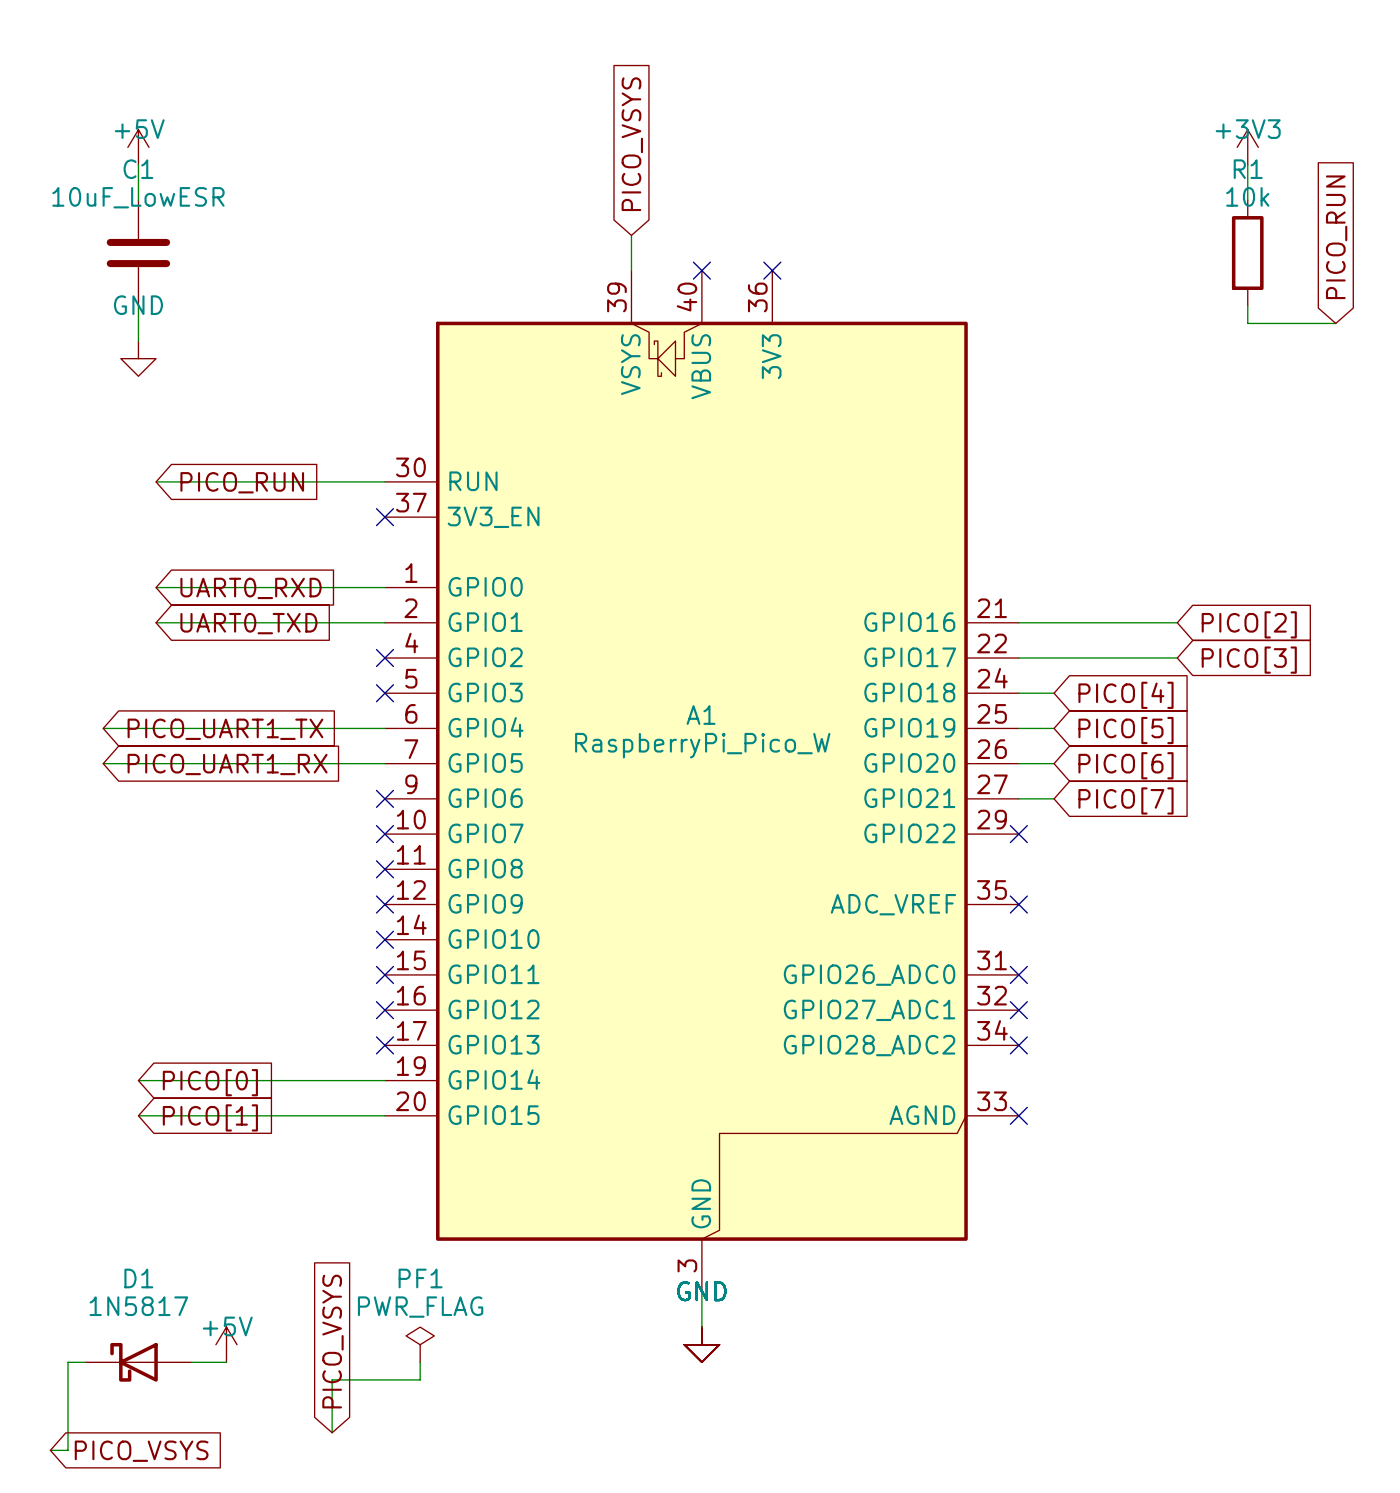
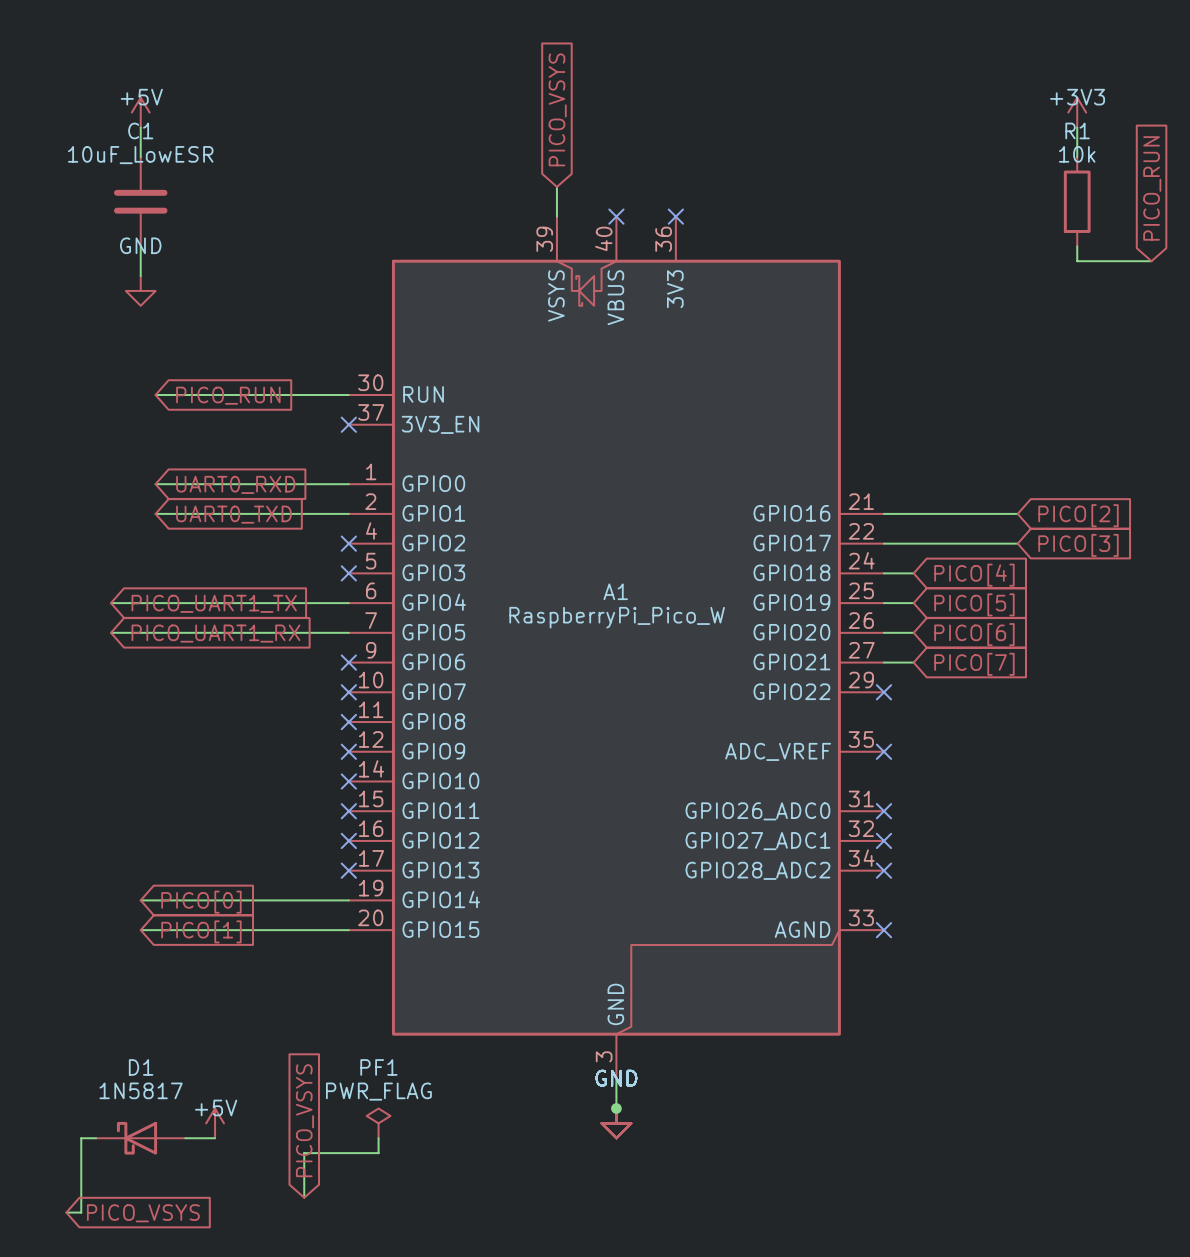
junction: none -> (616, 1108)

